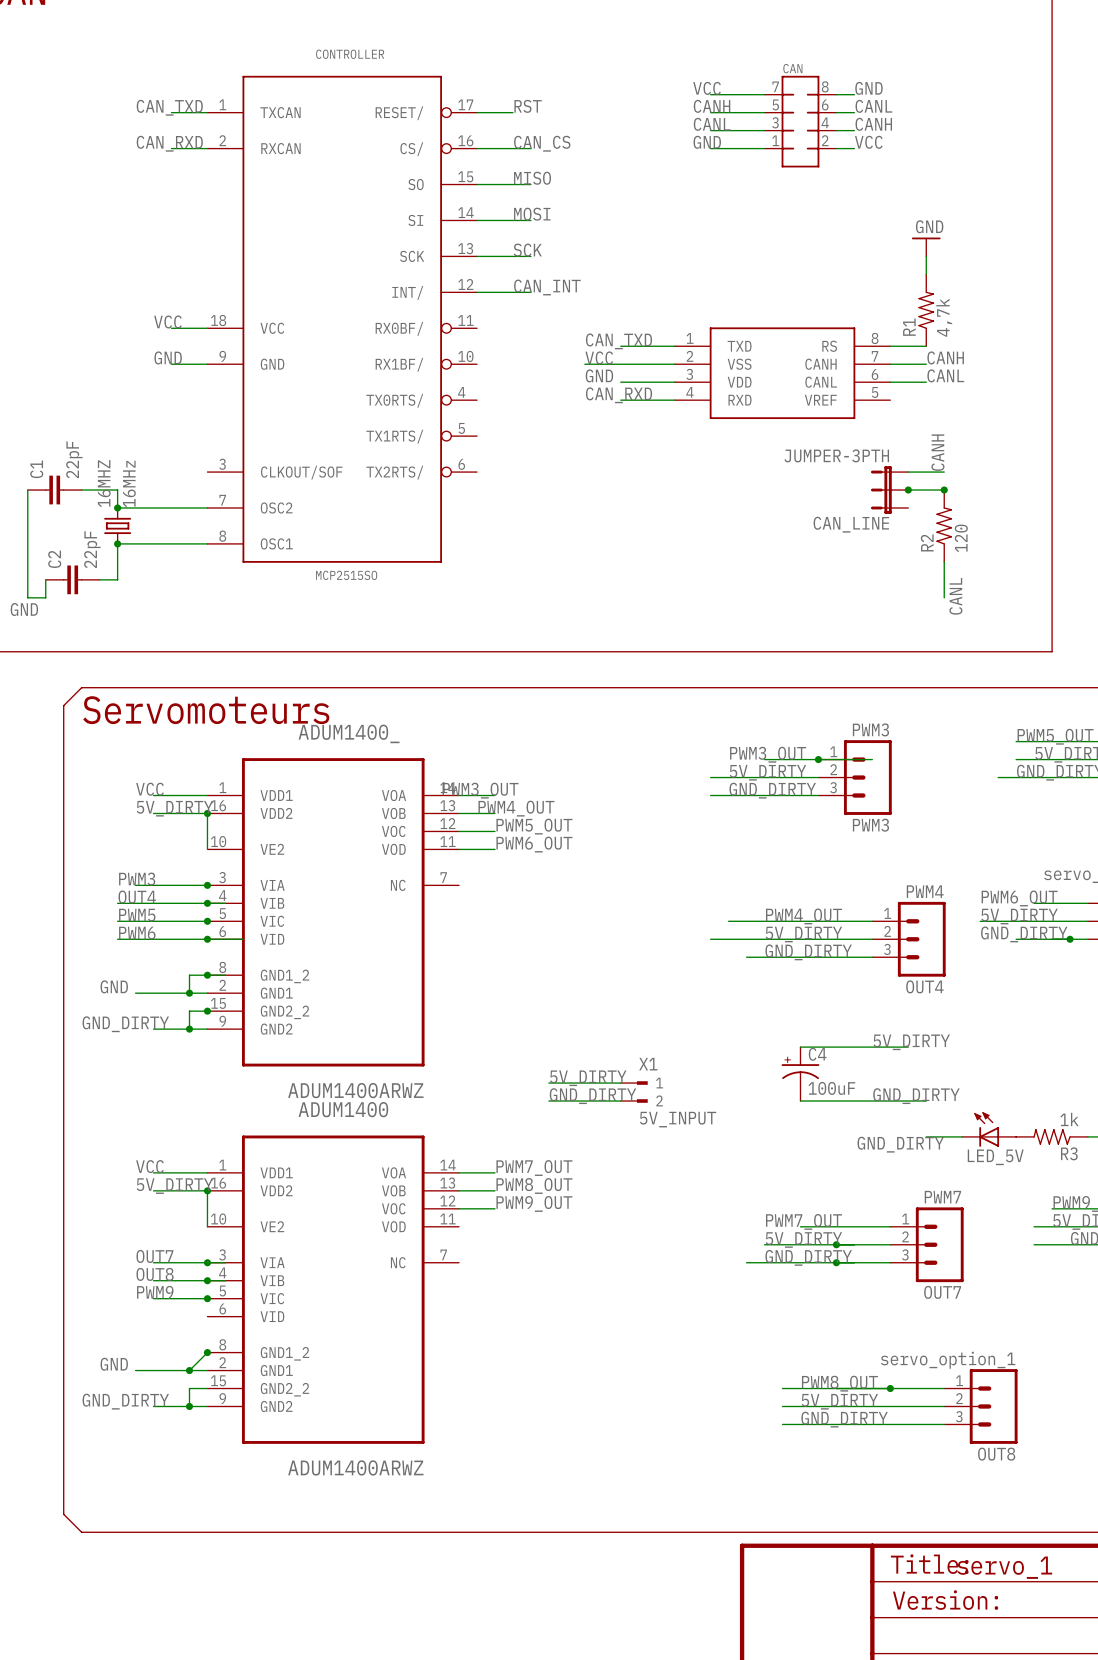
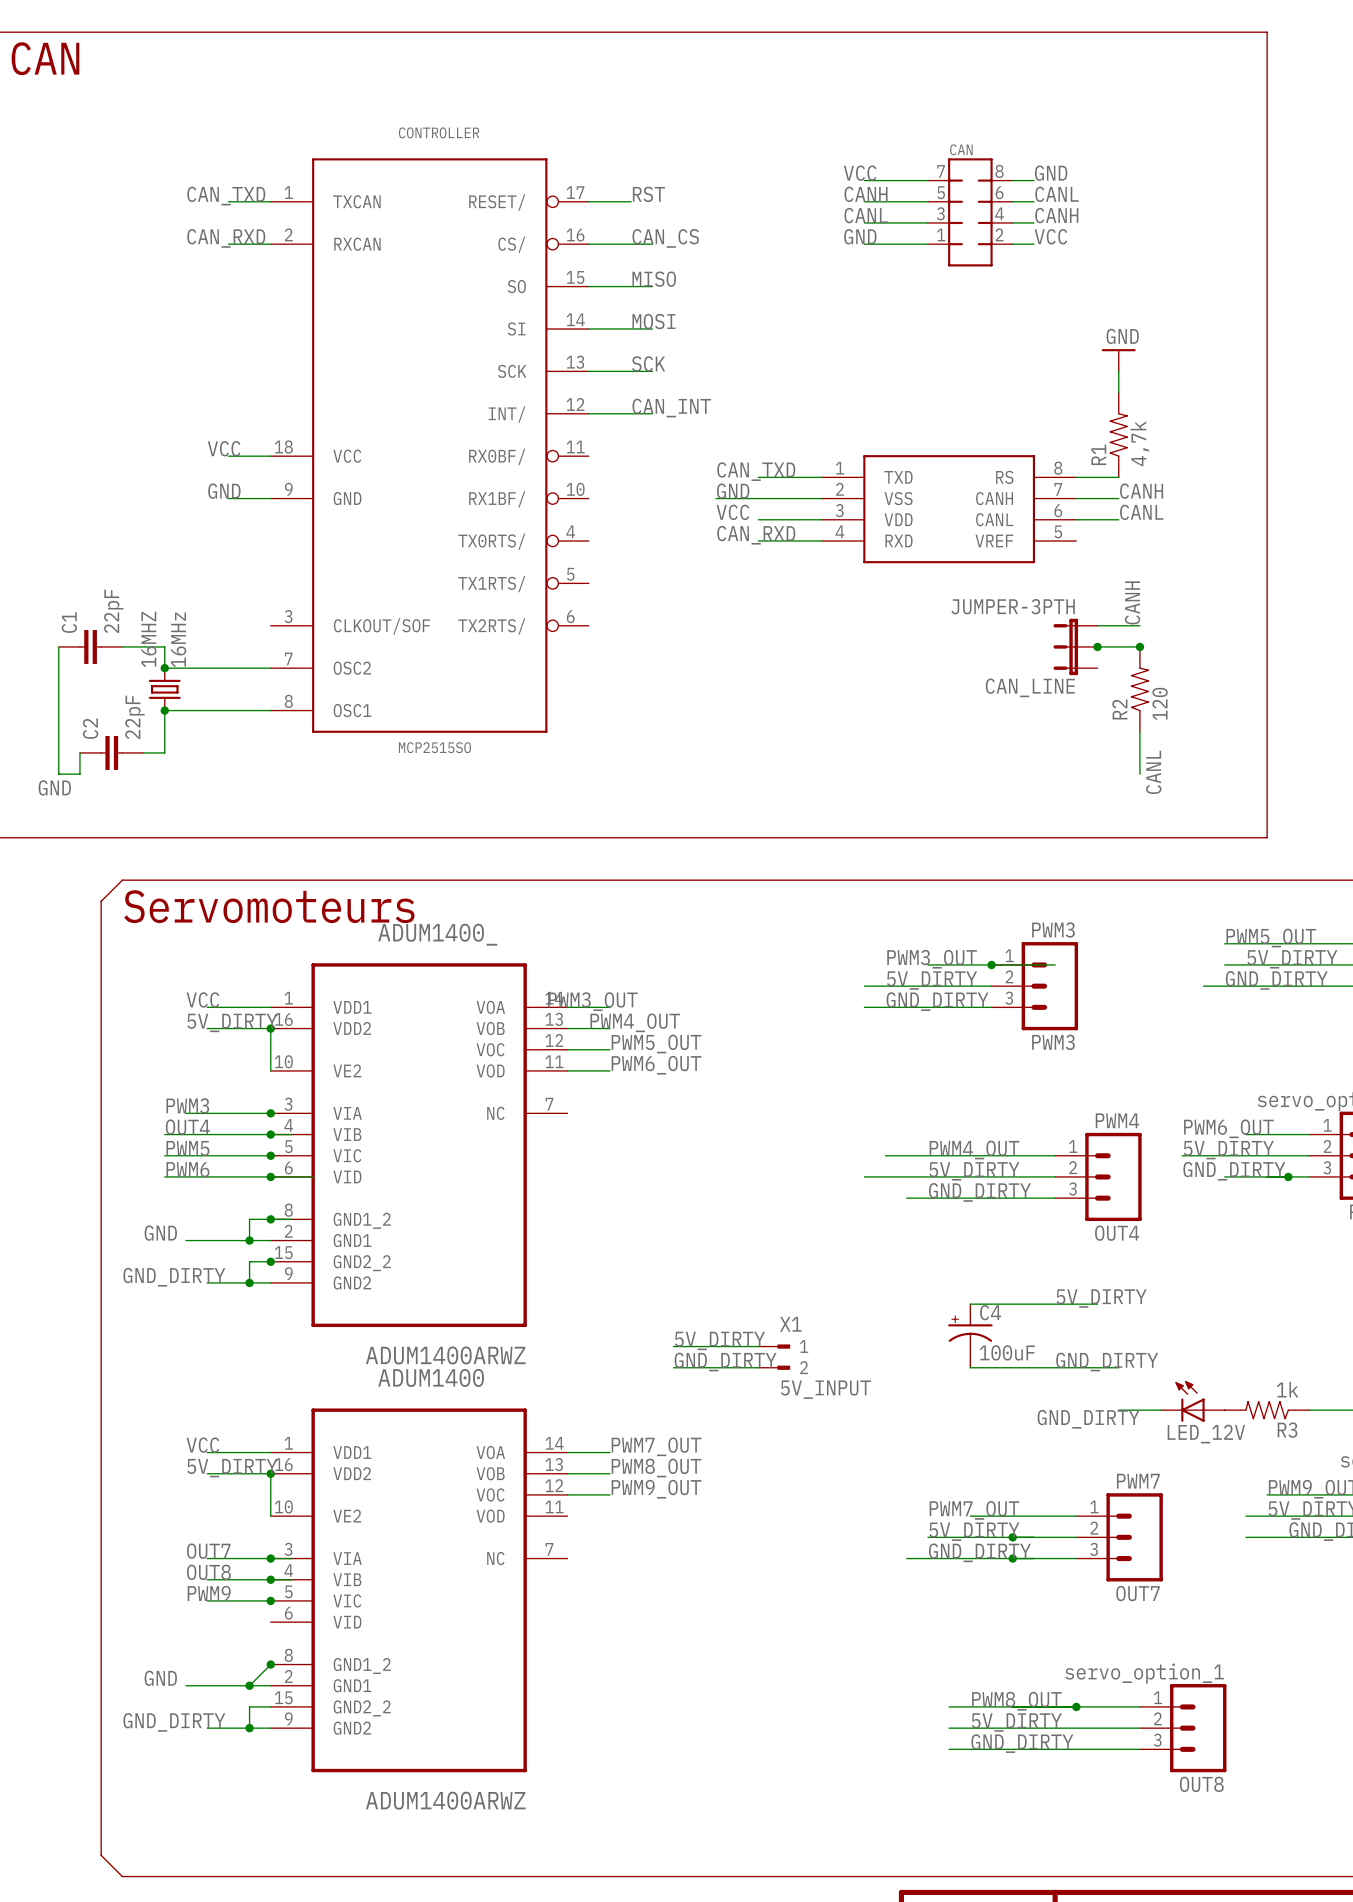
label: VCC (599, 357) -> GND (733, 491)
label: GND (599, 375) -> VCC (732, 512)
LED_5V name: LED_5V (995, 1157) -> LED_12V (1206, 1434)

